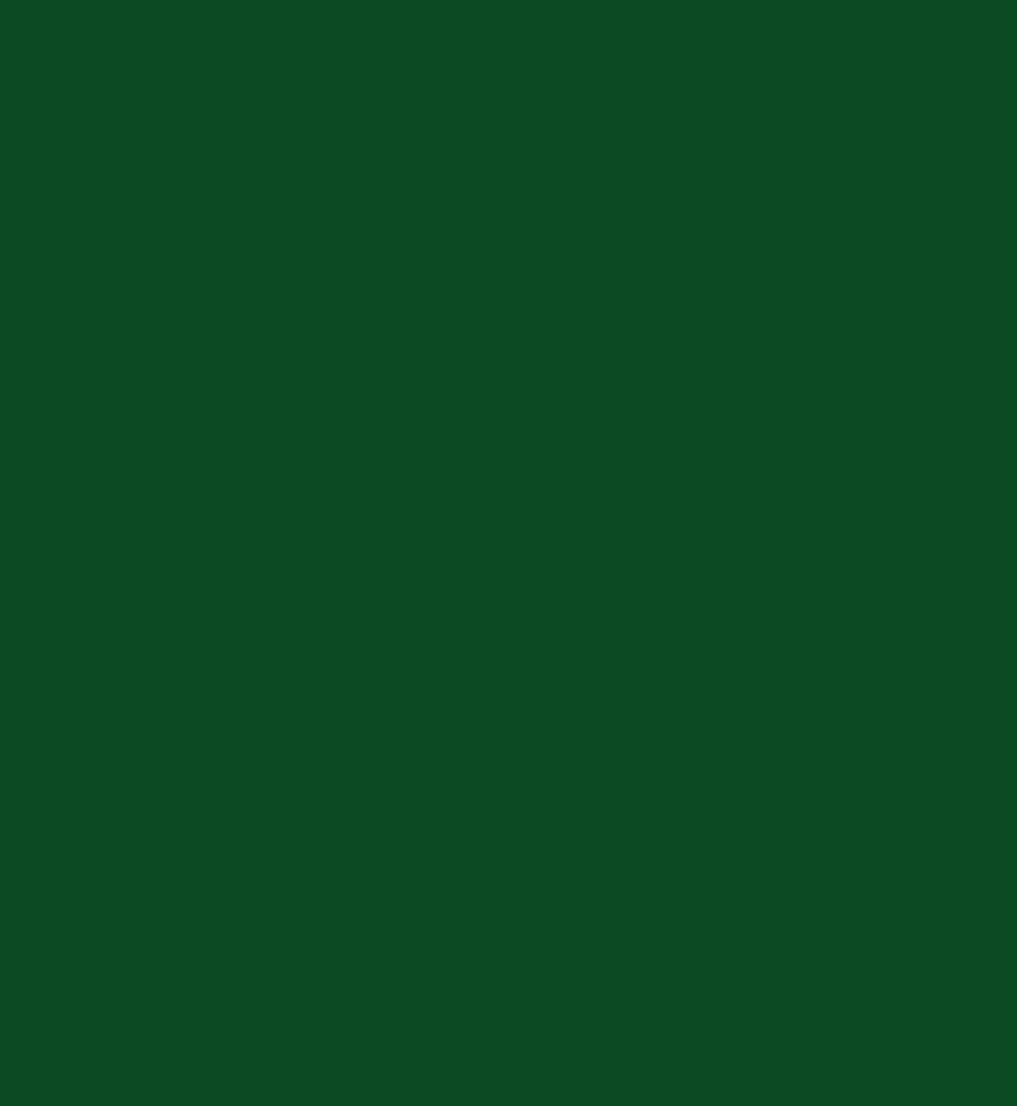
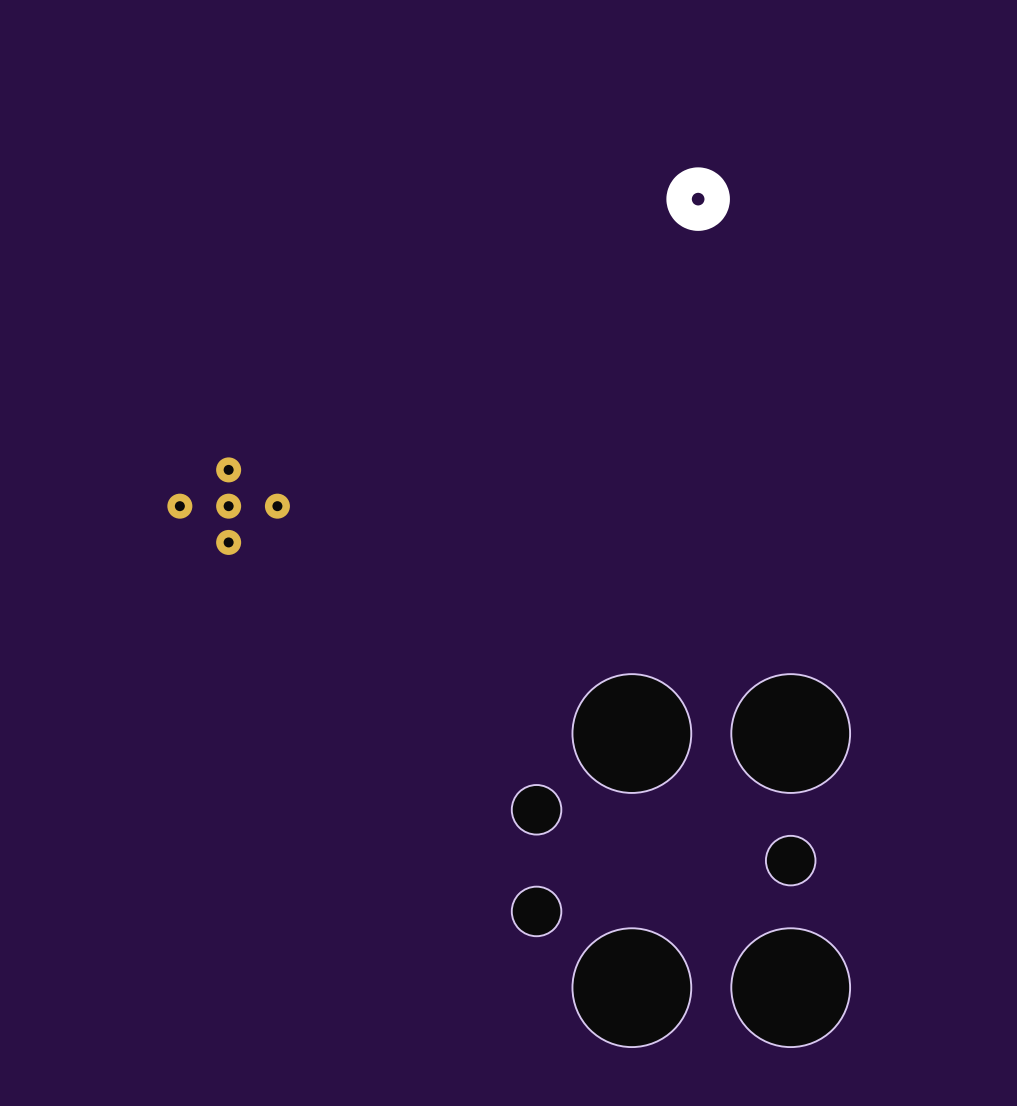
part: none -> (698, 199)
part: none -> (228, 506)
part: none -> (680, 860)

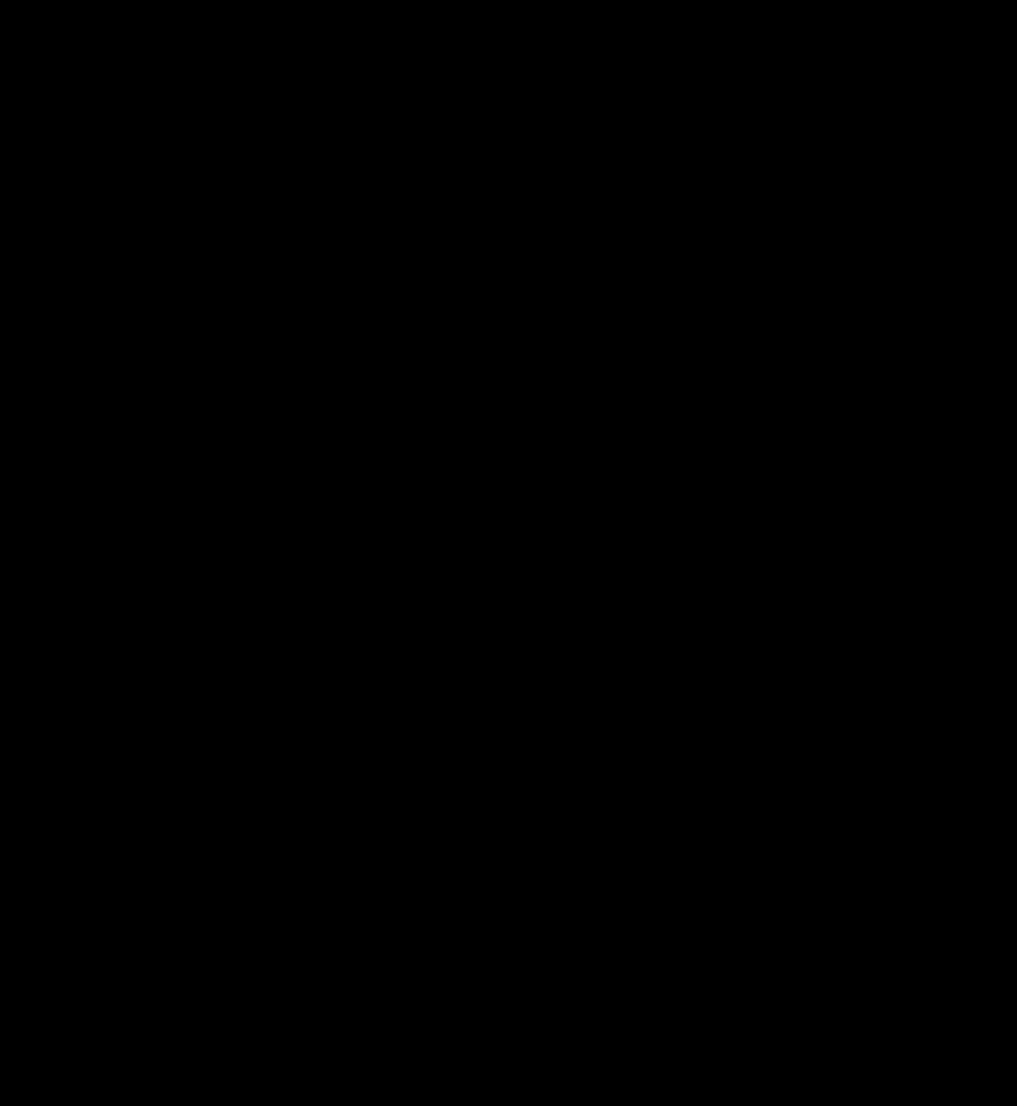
part: (698, 199) -> none
part: (228, 506) -> none
part: (680, 860) -> none

